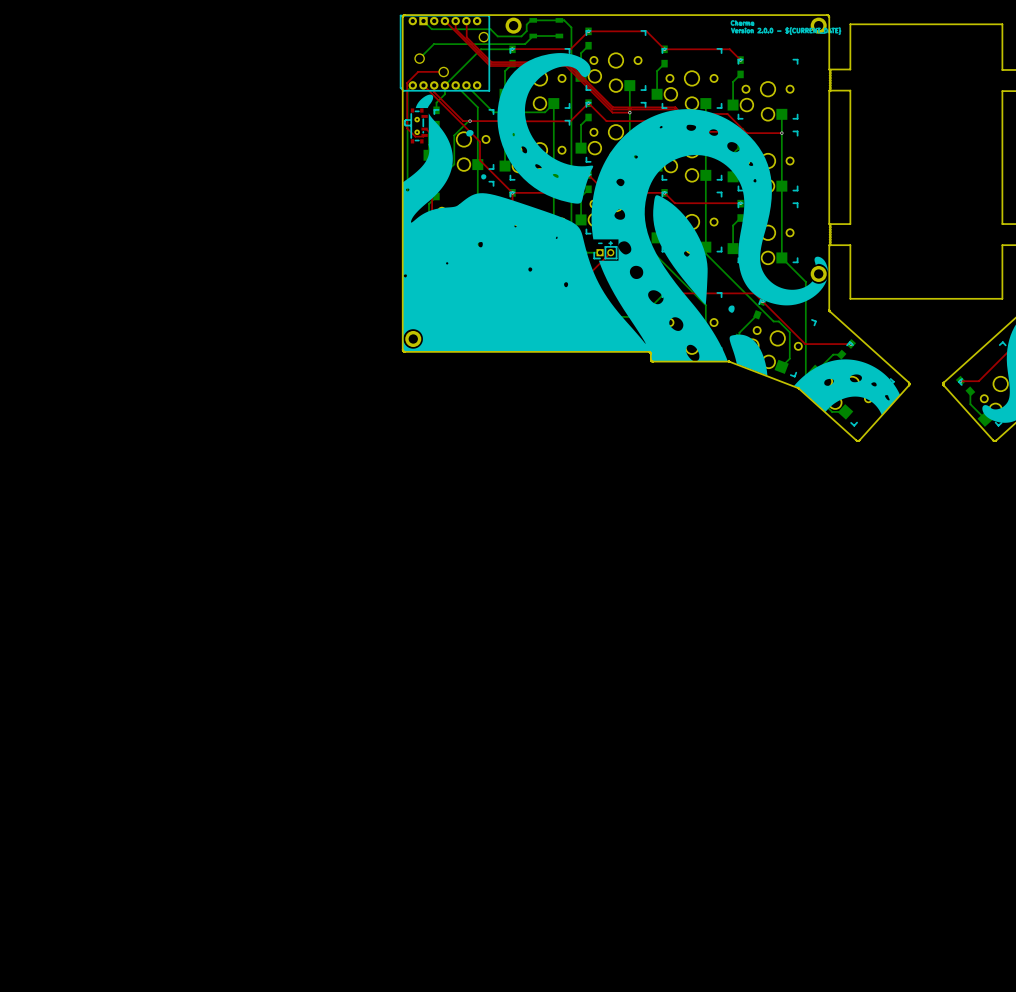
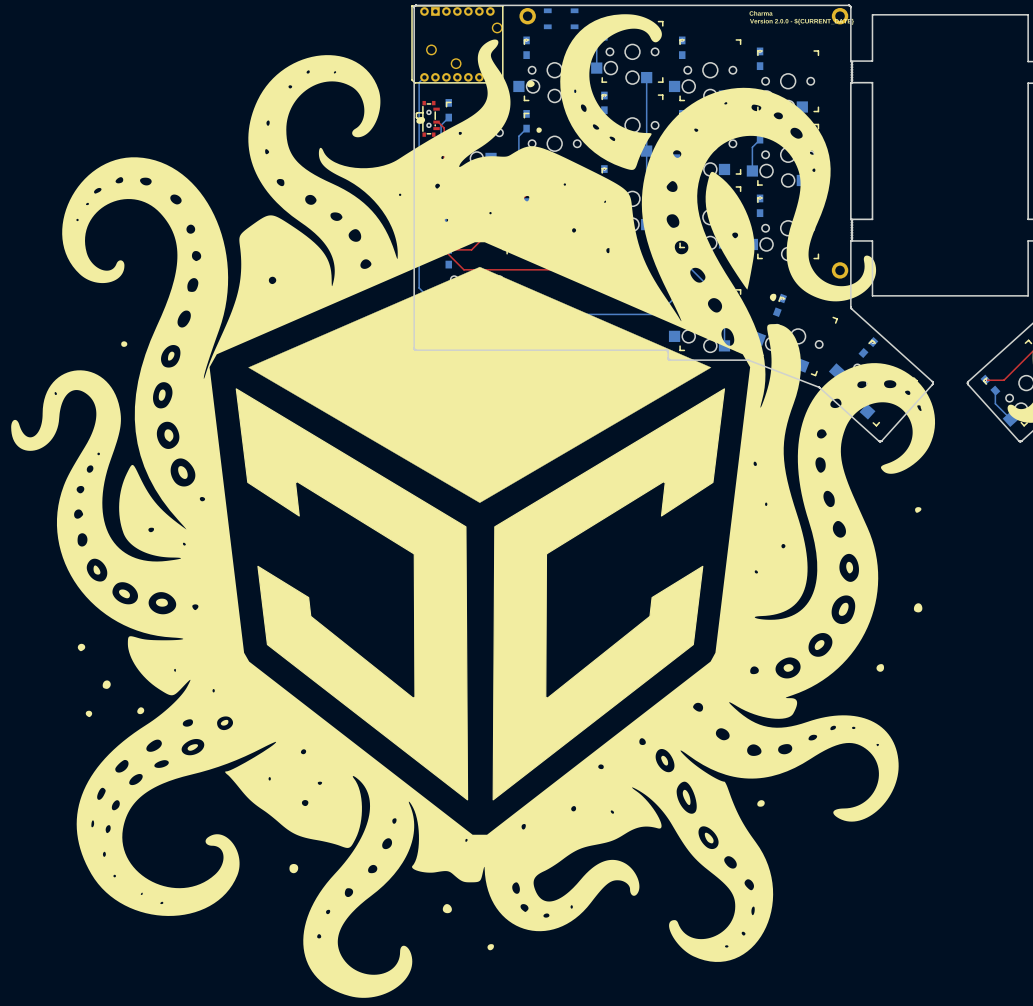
bottom track: (423, 20) (431, 29) (490, 29) (497, 36) (521, 36) (526, 31) (526, 24) (530, 20) (564, 20) (571, 27) (571, 237) (586, 252) (600, 252) -> none
top track: (444, 20) (490, 65) (565, 65) (612, 112) (629, 112) -> none
top track: (455, 20) (455, 28) (490, 64) (567, 64) (612, 109) (674, 109) (682, 117) (705, 117) -> none
top track: (466, 20) (466, 37) (491, 62) (567, 62) (613, 107) (675, 107) (682, 114) (727, 114) (746, 133) (781, 133) -> none
drawing: none -> [11, 14, 936, 998]
bottom track: (559, 36) (533, 35) (525, 44) (433, 44) (419, 58) -> none
top track: (512, 49) (570, 49) (588, 31) (646, 31) (664, 49) (729, 49) (740, 60) -> none
bottom track: (512, 49) (480, 49) (444, 85) (444, 94) (436, 102) (436, 110) -> none
drawing: [402, 53, 901, 416] -> none
bottom track: (512, 63) (505, 71) (505, 94) -> none
bottom track: (664, 63) (657, 71) (657, 94) -> none
top track: (443, 71) (418, 71) (407, 82) (407, 128) (415, 136) (424, 135) -> none
bottom track: (740, 74) (733, 81) (733, 105) -> none
top track: (423, 85) (480, 141) (480, 160) (512, 192) (570, 192) (588, 174) (606, 192) (664, 192) (674, 203) (740, 203) -> none
top track: (434, 85) (434, 92) (463, 121) (570, 121) (588, 103) (606, 121) (664, 121) (675, 131) (740, 131) -> none
bottom track: (455, 85) (477, 107) (477, 308) -> none
bottom track: (466, 85) (493, 112) (545, 112) (553, 103) (553, 247) -> none
bottom track: (705, 103) (705, 253) (773, 321) (778, 321) (789, 332) (789, 358) (781, 366) -> none
via: (629, 112) -> none
bottom track: (781, 114) (781, 257) (805, 281) (805, 385) (832, 411) (845, 411) -> none
bottom track: (588, 117) (581, 125) (581, 148) -> none
bottom track: (470, 121) (454, 135) (454, 164) (436, 182) -> none
via: (470, 121) -> none
via: (781, 133) -> none
bottom track: (588, 189) (581, 196) (581, 219) -> none
via: (512, 192) -> none
via: (664, 192) -> none
bottom track: (740, 218) (733, 225) (733, 248) -> none
top track: (664, 293) (754, 293) (805, 344) (851, 344) -> none
bottom track: (757, 314) (739, 332) (739, 340) -> none
bottom track: (841, 354) (833, 354) (815, 372) -> none

